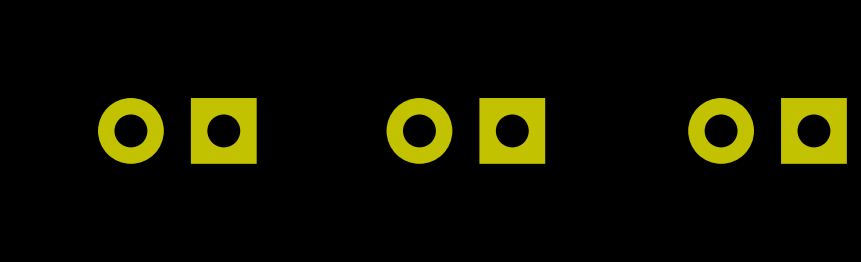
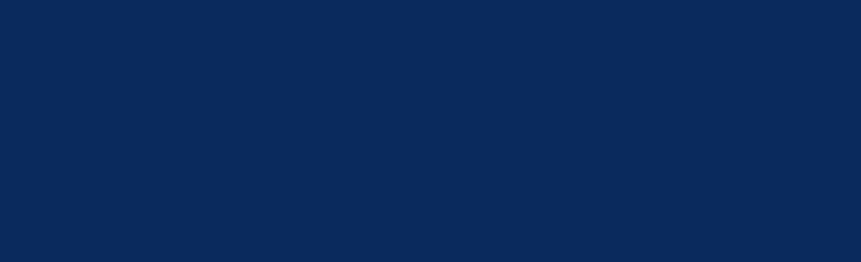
part: (177, 130) -> none
part: (465, 130) -> none
part: (767, 130) -> none

